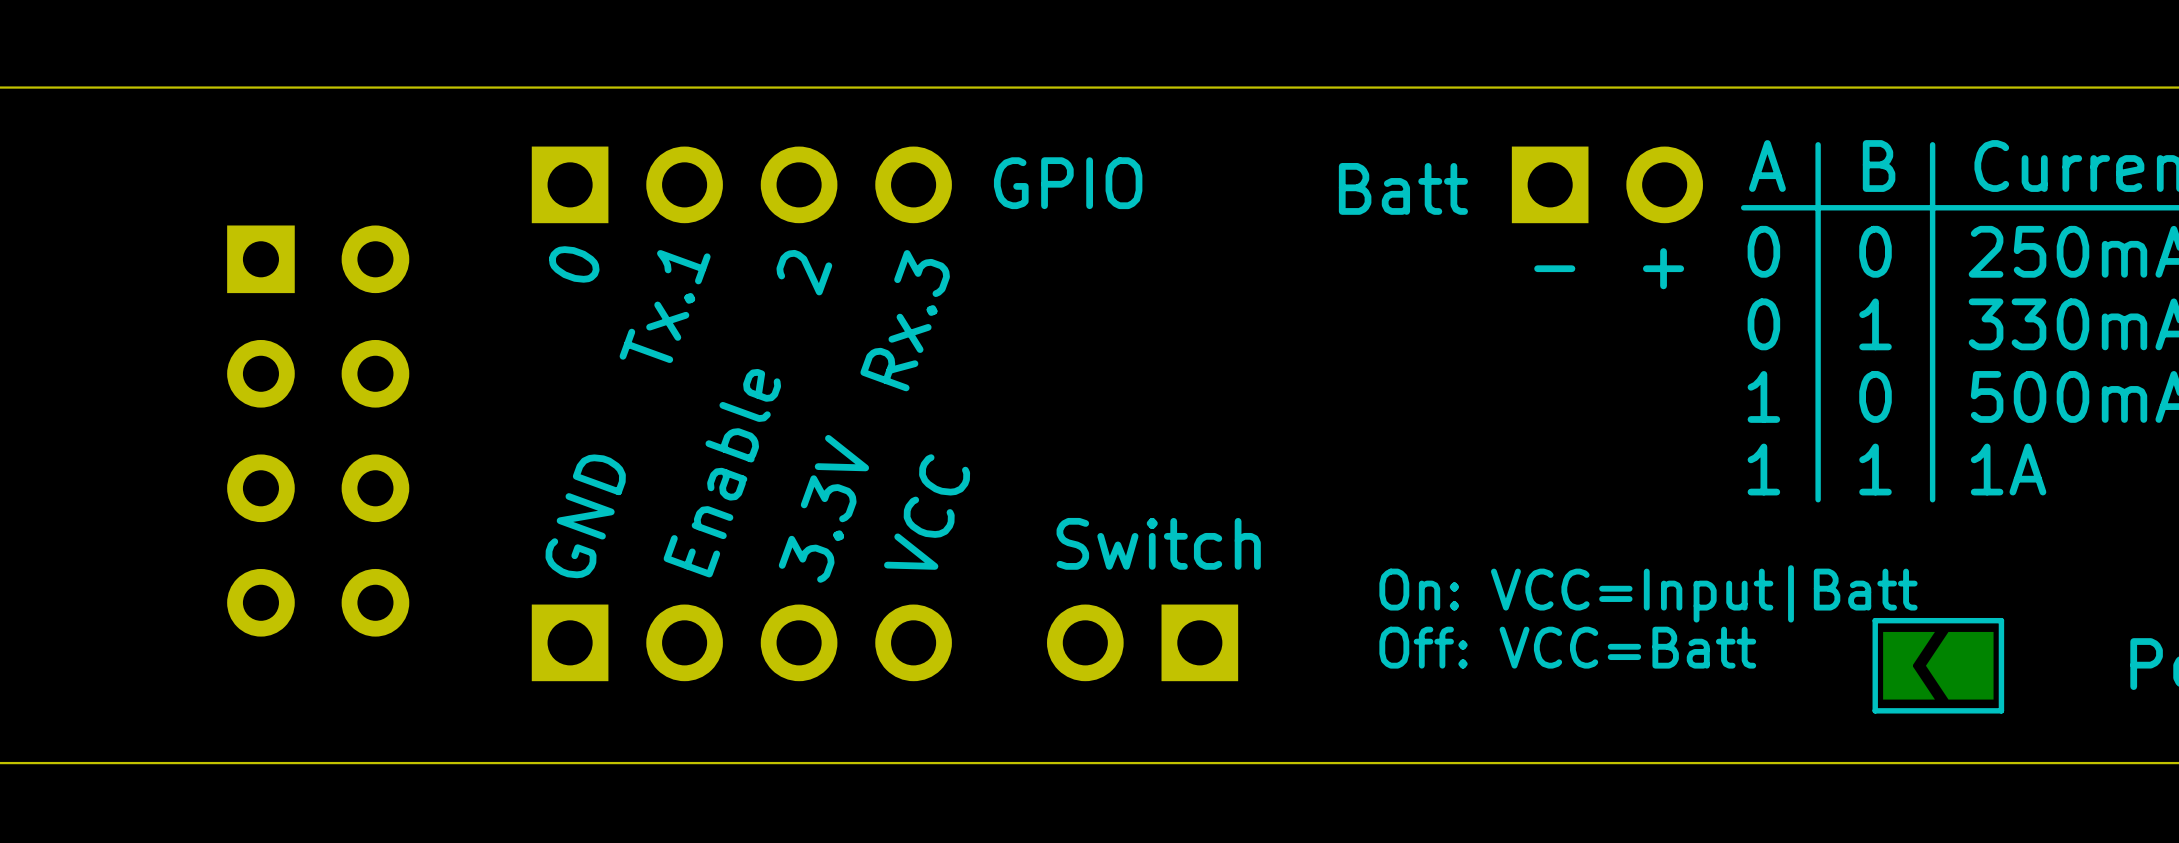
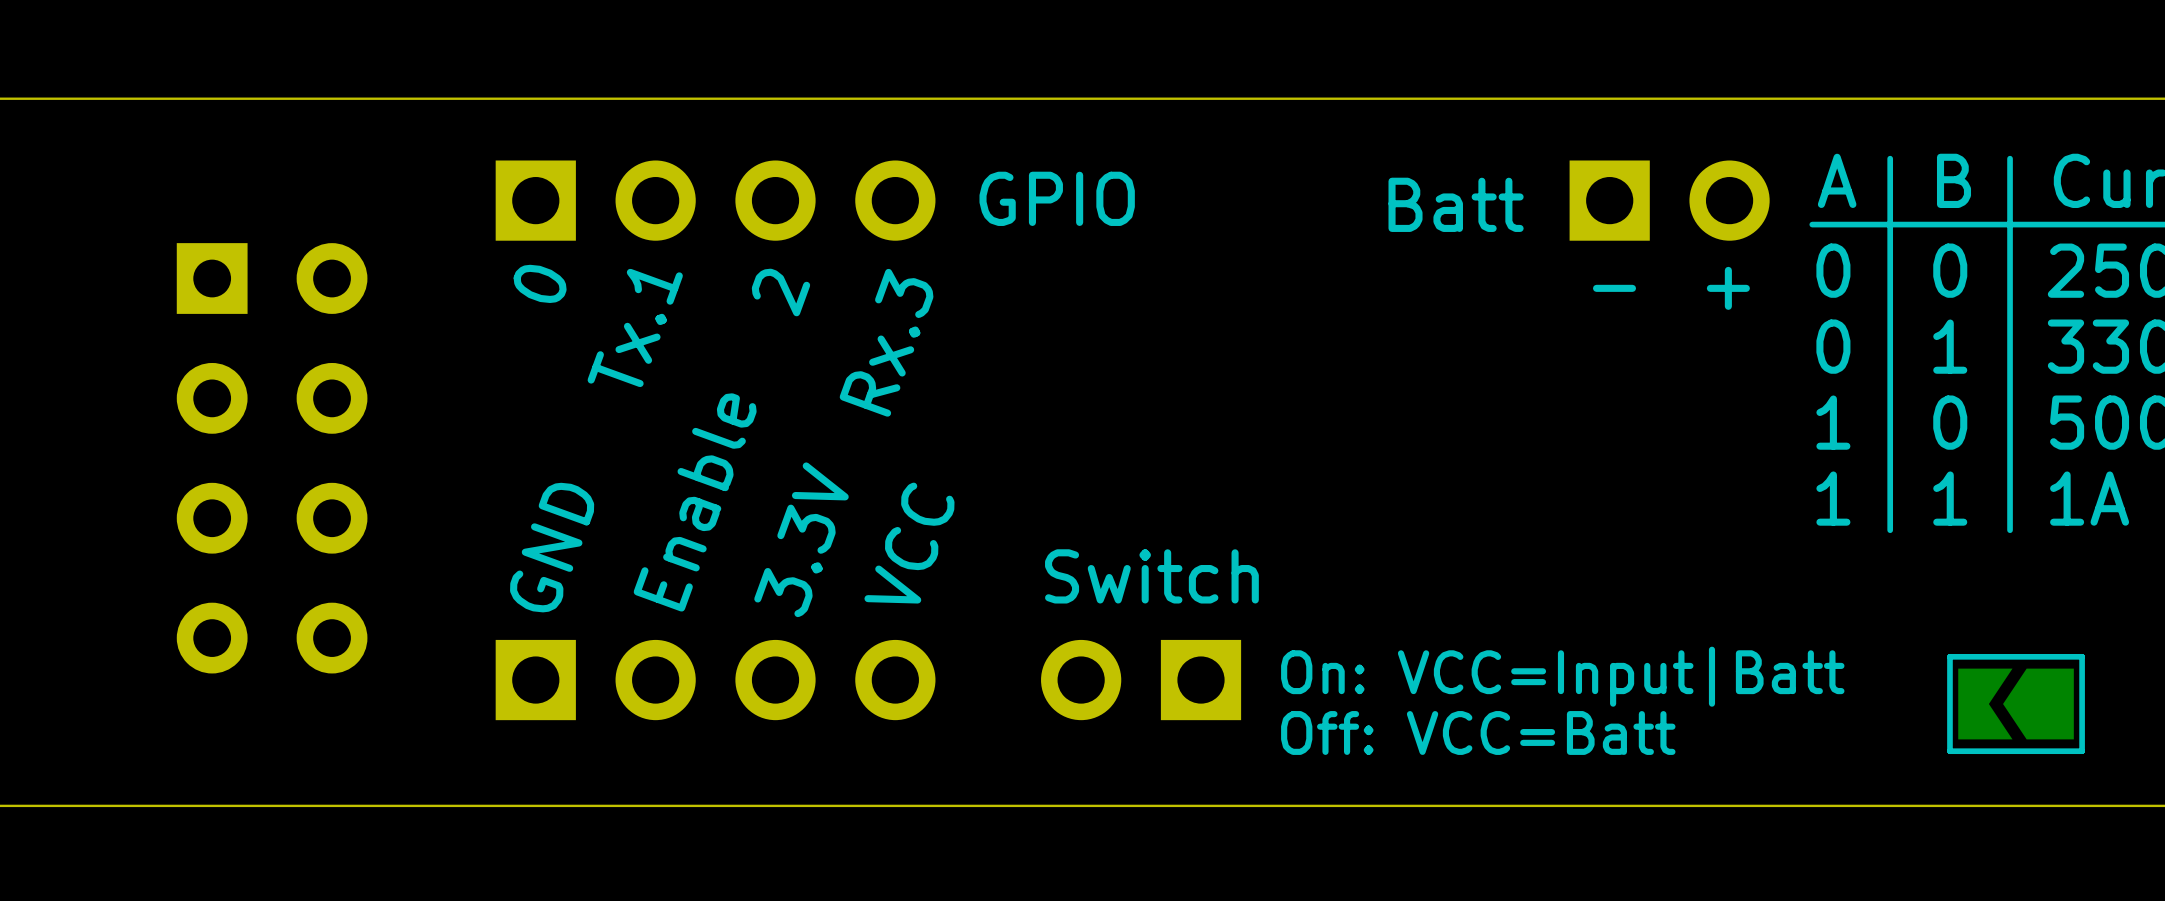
text position: GPIO (1068, 183) -> GPIO (1057, 198)
part position: (741, 184) -> (715, 200)
text position: 0 (574, 264) -> 0 (540, 283)
text position: 2 (804, 272) -> 2 (780, 292)
text position: Tx.1 (665, 306) -> Tx.1 (635, 327)
text position: Rx.3 (905, 320) -> Rx.3 (886, 342)
part position: (318, 431) -> (272, 458)
text position: Enable (722, 473) -> Enable (695, 502)
text position: 3.3V (823, 508) -> 3.3V (801, 539)
text position: VCC (927, 512) -> VCC (909, 543)
text position: GND (585, 516) -> GND (552, 547)
text position: Switch (1158, 543) -> Switch (1151, 576)
text position: On: VCC=Input|Batt (1648, 593) -> On: VCC=Input|Batt (1562, 676)
part position: (741, 642) -> (715, 680)
part position: (1142, 642) -> (1141, 680)
text position: Off: VCC=Batt (1567, 647) -> Off: VCC=Batt (1478, 732)

